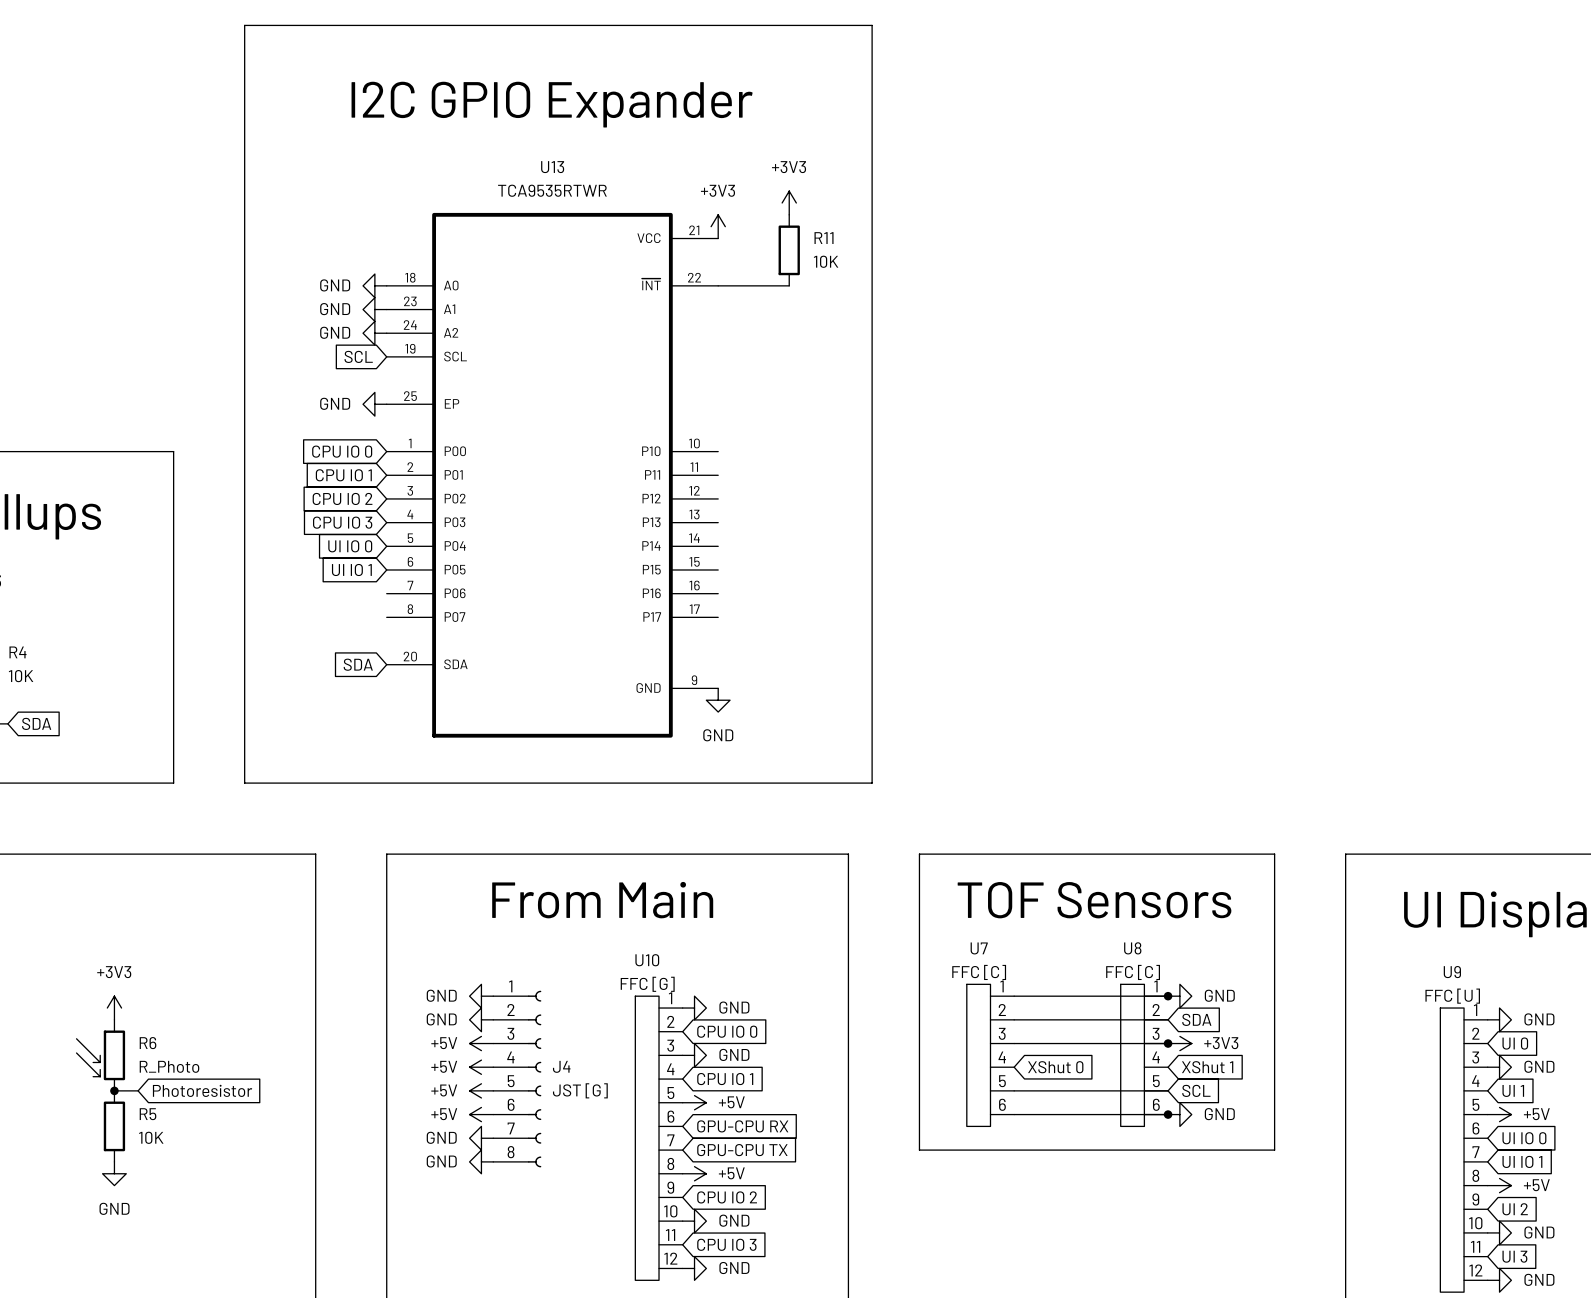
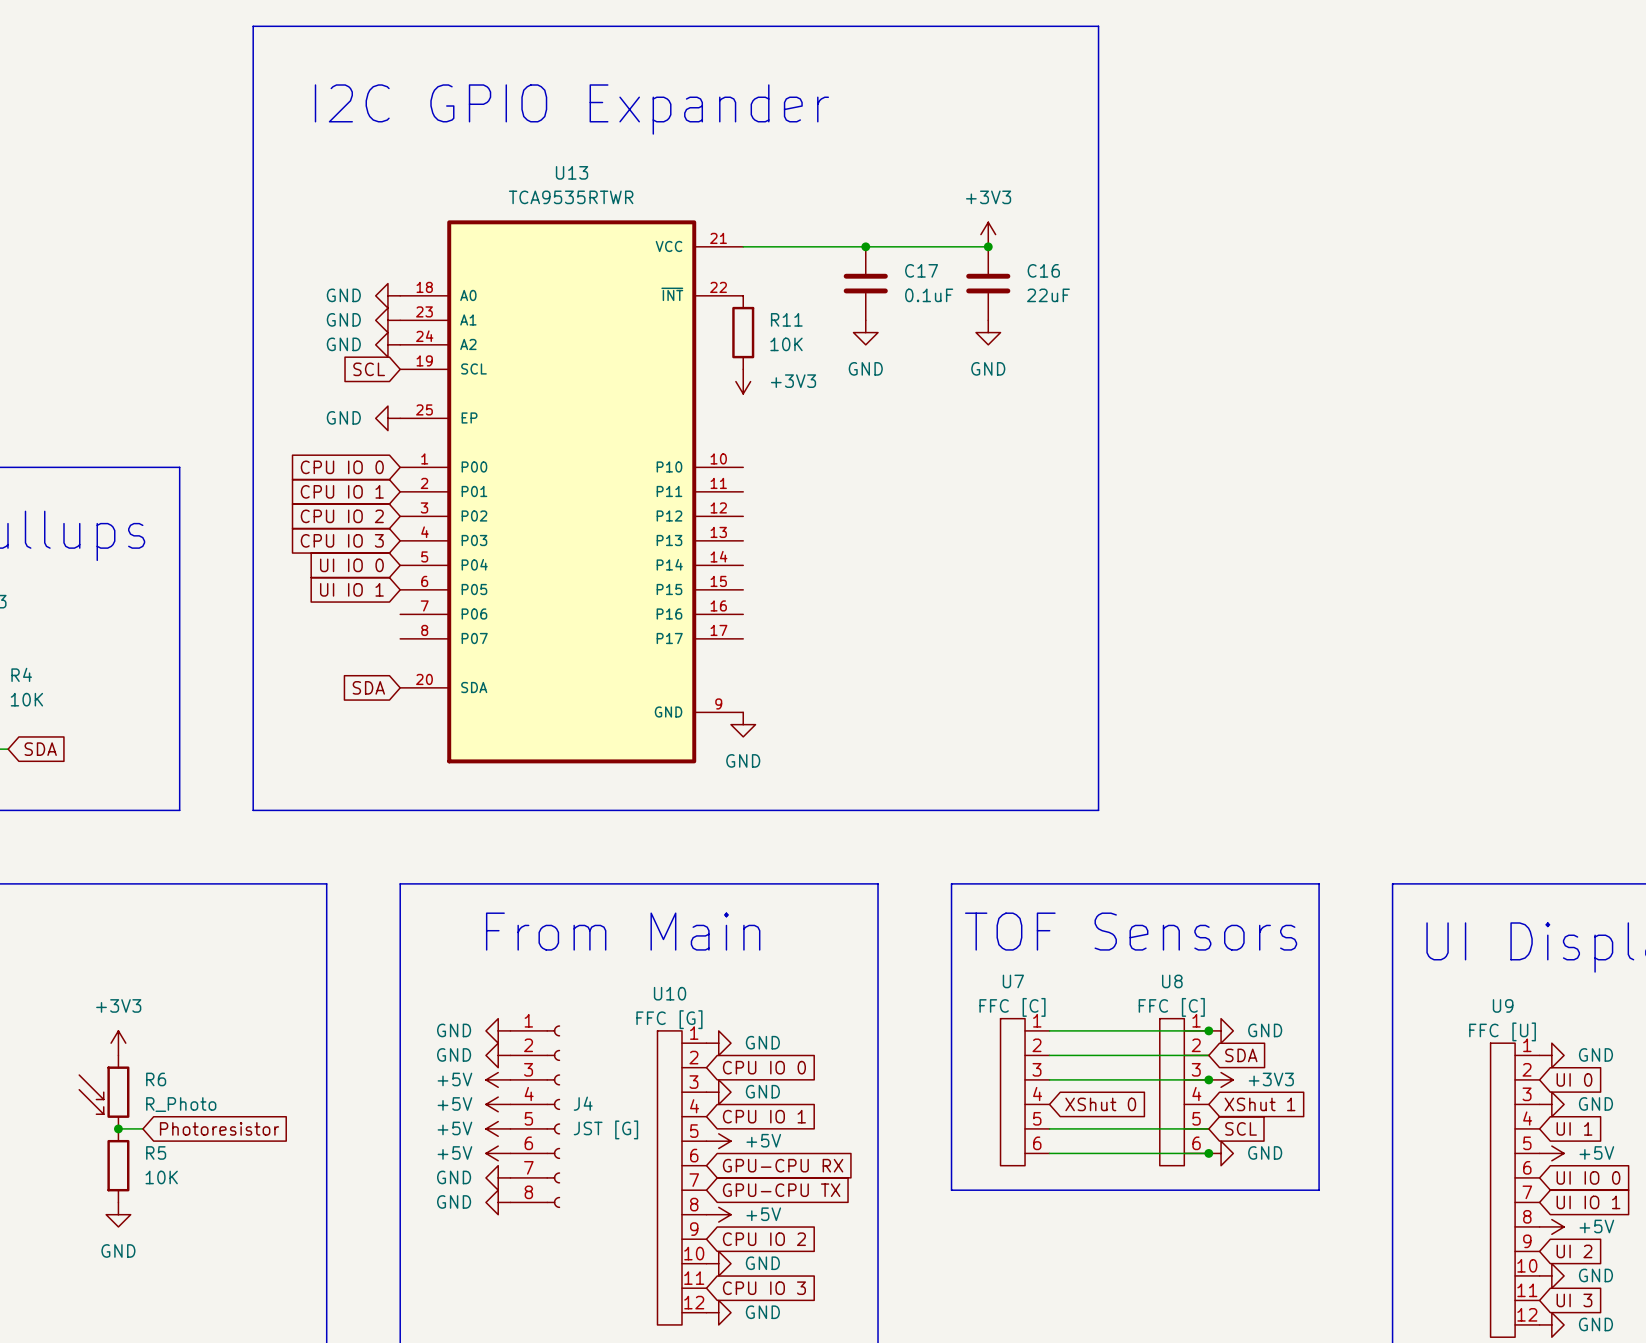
line: (872, 25) (872, 783) -> (902, 26) (1098, 26) (1098, 810) (902, 810)
power symbol: +3V3 (789, 203) -> none
power symbol: +3V3 (718, 226) -> none
power symbol: none -> +3V3 (988, 234)
wire: none -> (743, 246) (988, 246)
junction: none -> (865, 246)
junction: none -> (988, 246)
R11 position: (789, 250) -> (743, 332)
C17: none -> 0.1uF (865, 283)
C16: none -> 22uF (988, 283)
wire: (718, 285) (789, 285) -> none
power symbol: none -> GND (865, 332)
power symbol: none -> GND (988, 332)
power symbol: none -> +3V3 (743, 381)

